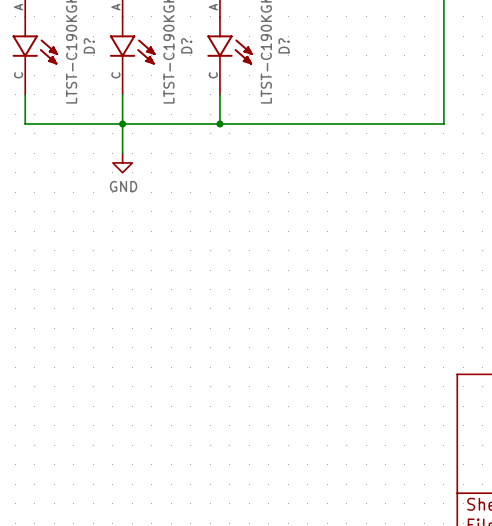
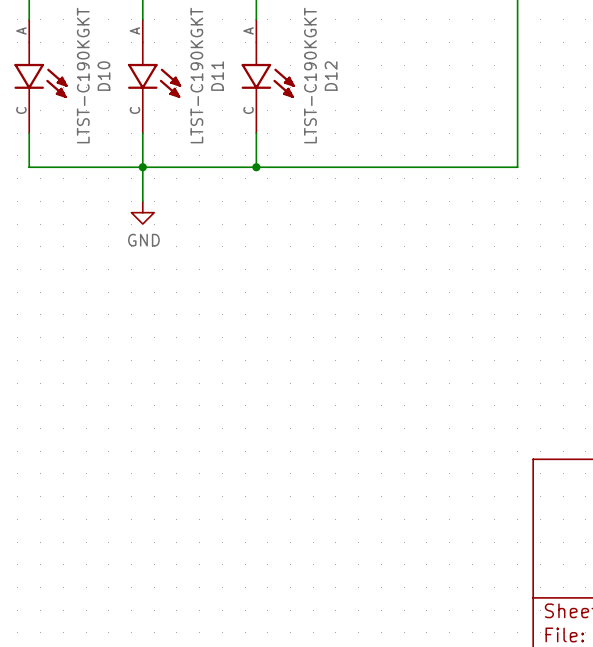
D? name: D? (89, 45) -> D10 (103, 76)
D? name: D? (186, 45) -> D11 (217, 76)
D? name: D? (284, 45) -> D12 (331, 76)

